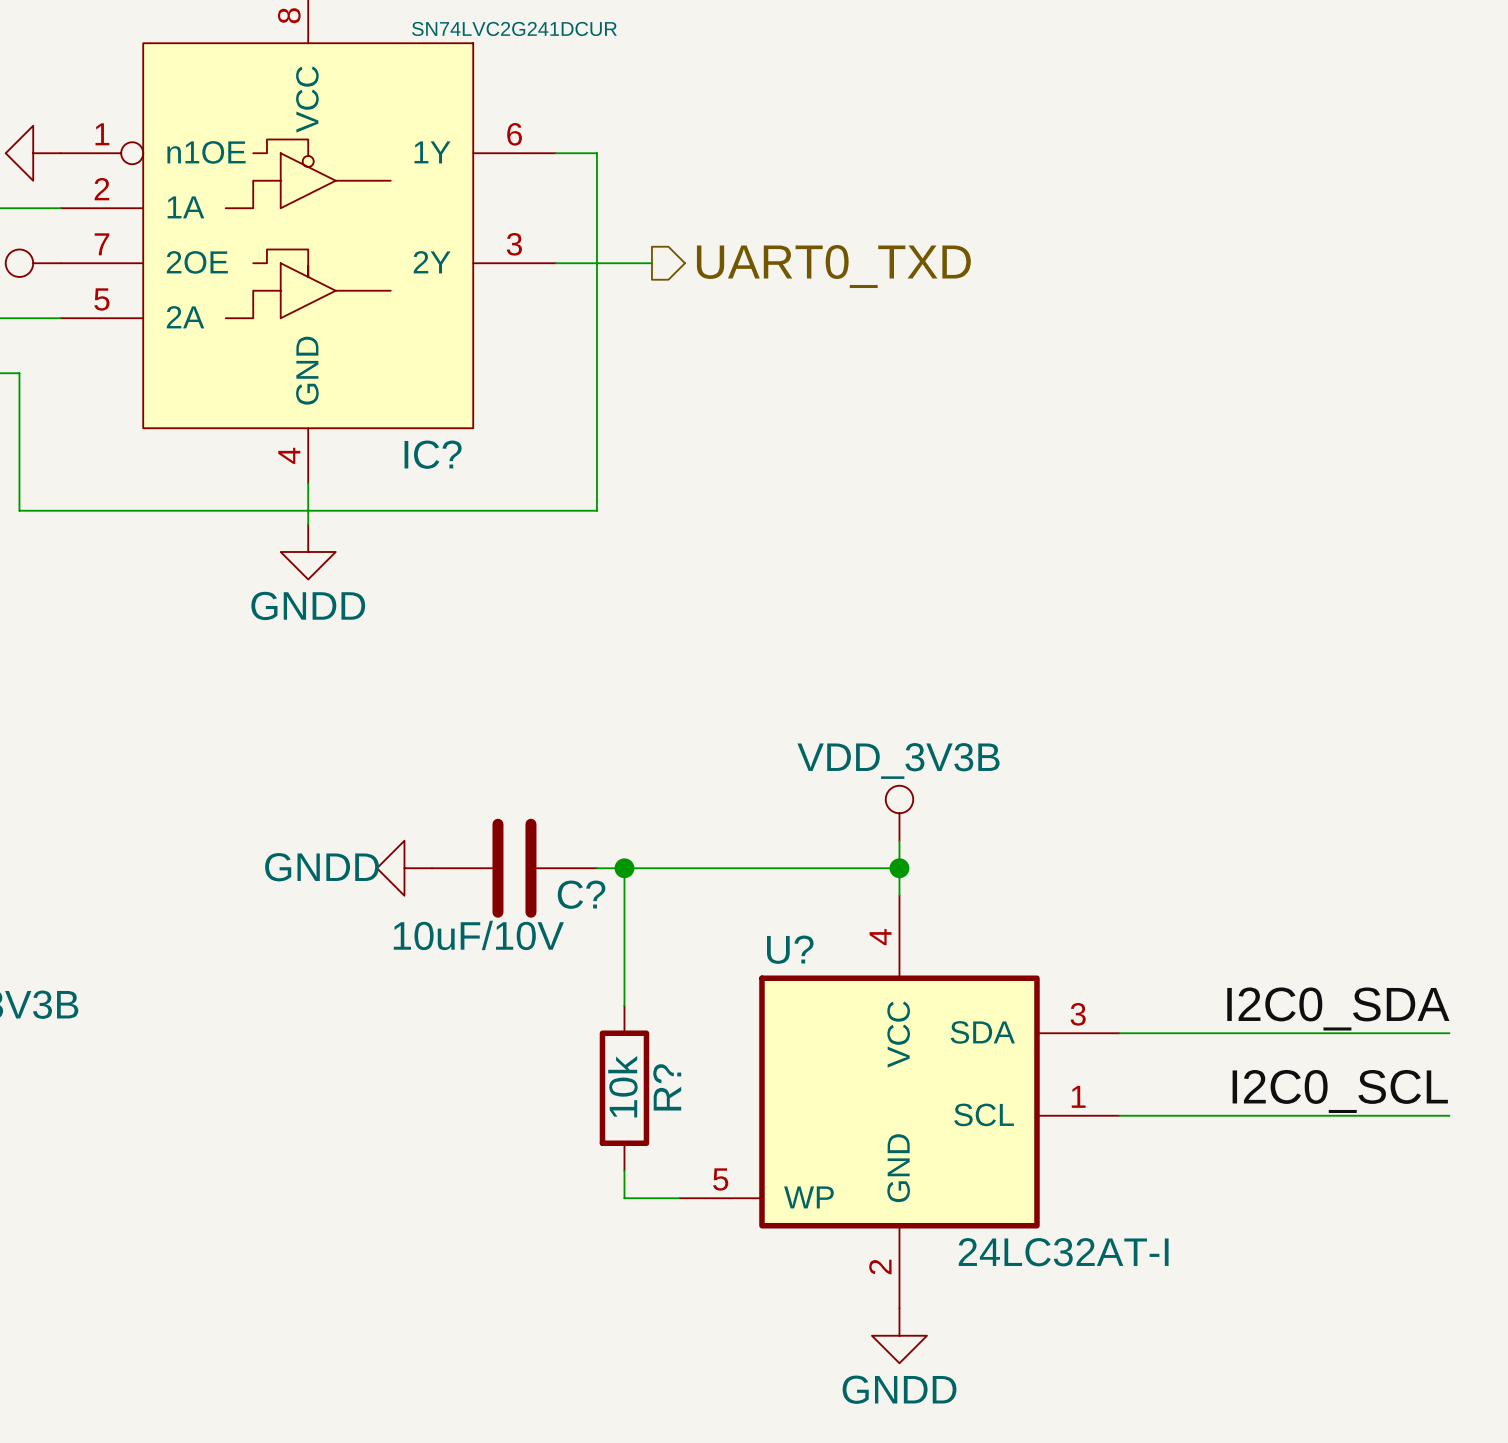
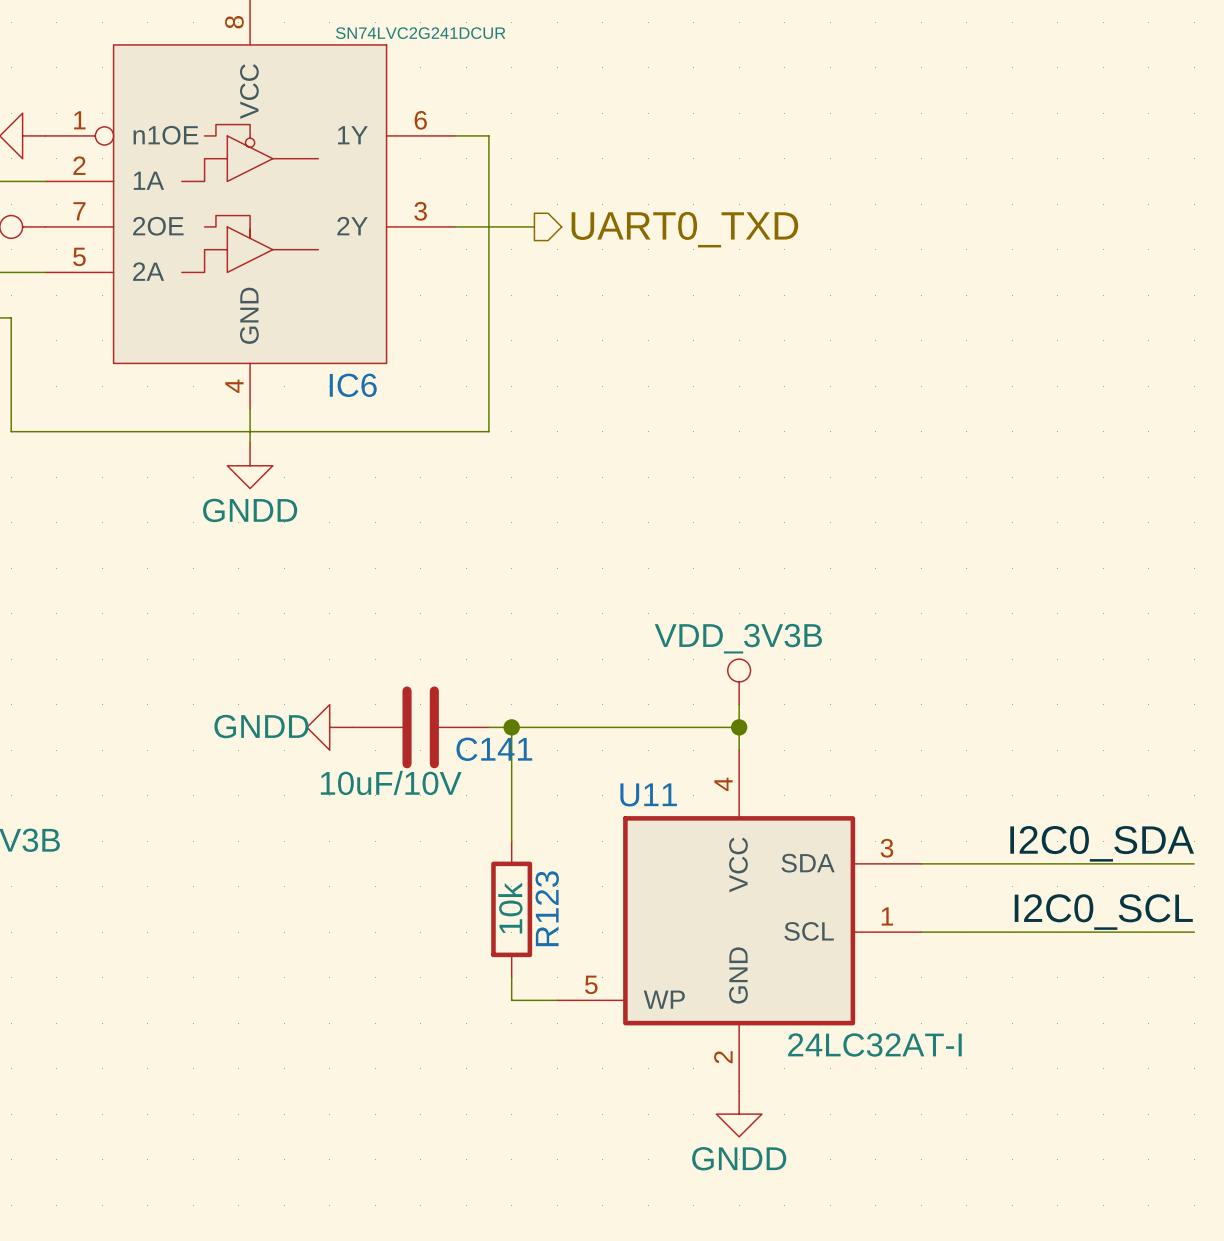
IC? name: IC? (433, 454) -> IC6 (353, 385)
C? name: C? (581, 894) -> C141 (494, 749)
U? name: U? (790, 949) -> U11 (648, 794)
R? name: R? (667, 1087) -> R123 (547, 908)

